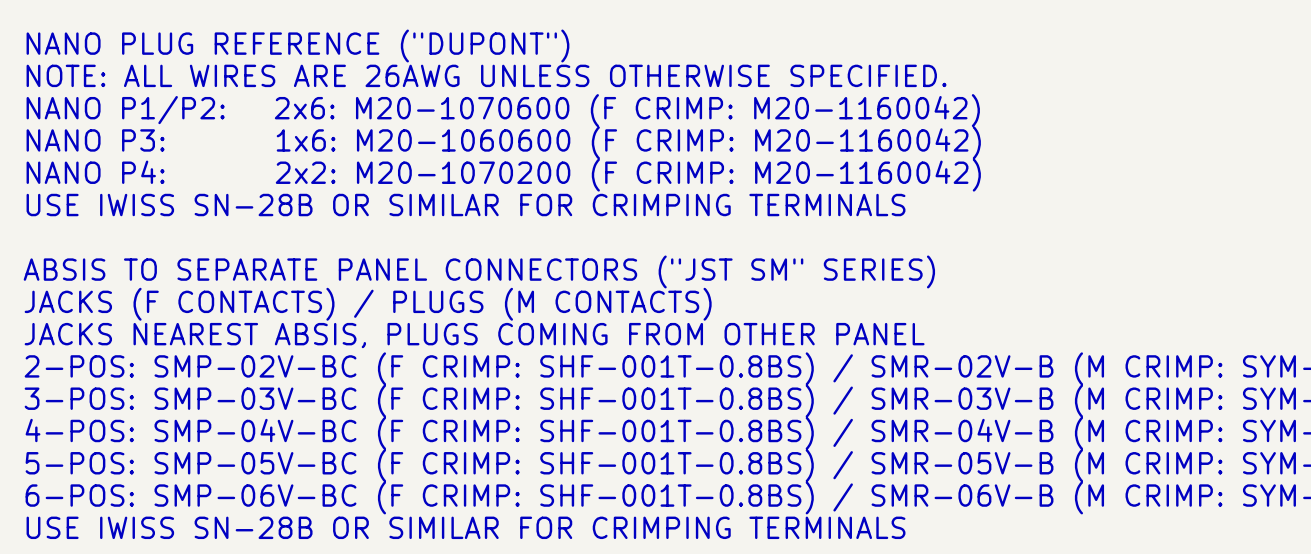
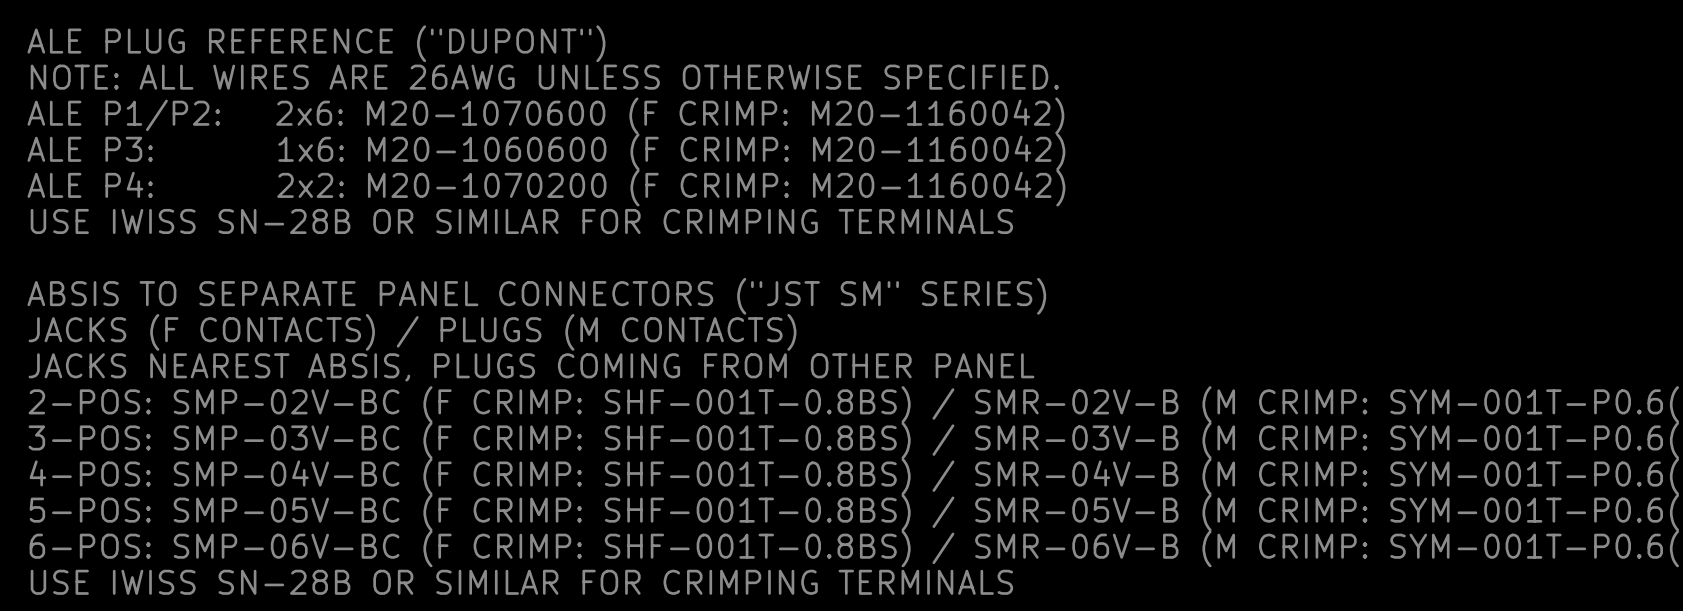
text: NANO PLUG REFERENCE ("DUPONT") (297, 45) -> ALE PLUG REFERENCE ("DUPONT") (316, 43)
text: NANO P1/P2: 2x6: M20-1070600 (F CRIMP: M20-1160042) (503, 110) -> ALE P1/P2: 2x6: M20-1070600 (F CRIMP: M20-1160042) (545, 115)
text: NANO P3: 1x6: M20-1060600 (F CRIMP: M20-1160042) (503, 142) -> ALE P3: 1x6: M20-1060600 (F CRIMP: M20-1160042) (546, 151)
text: NANO P4: 2x2: M20-1070200 (F CRIMP: M20-1160042) (503, 175) -> ALE P4: 2x2: M20-1070200 (F CRIMP: M20-1160042) (546, 188)

